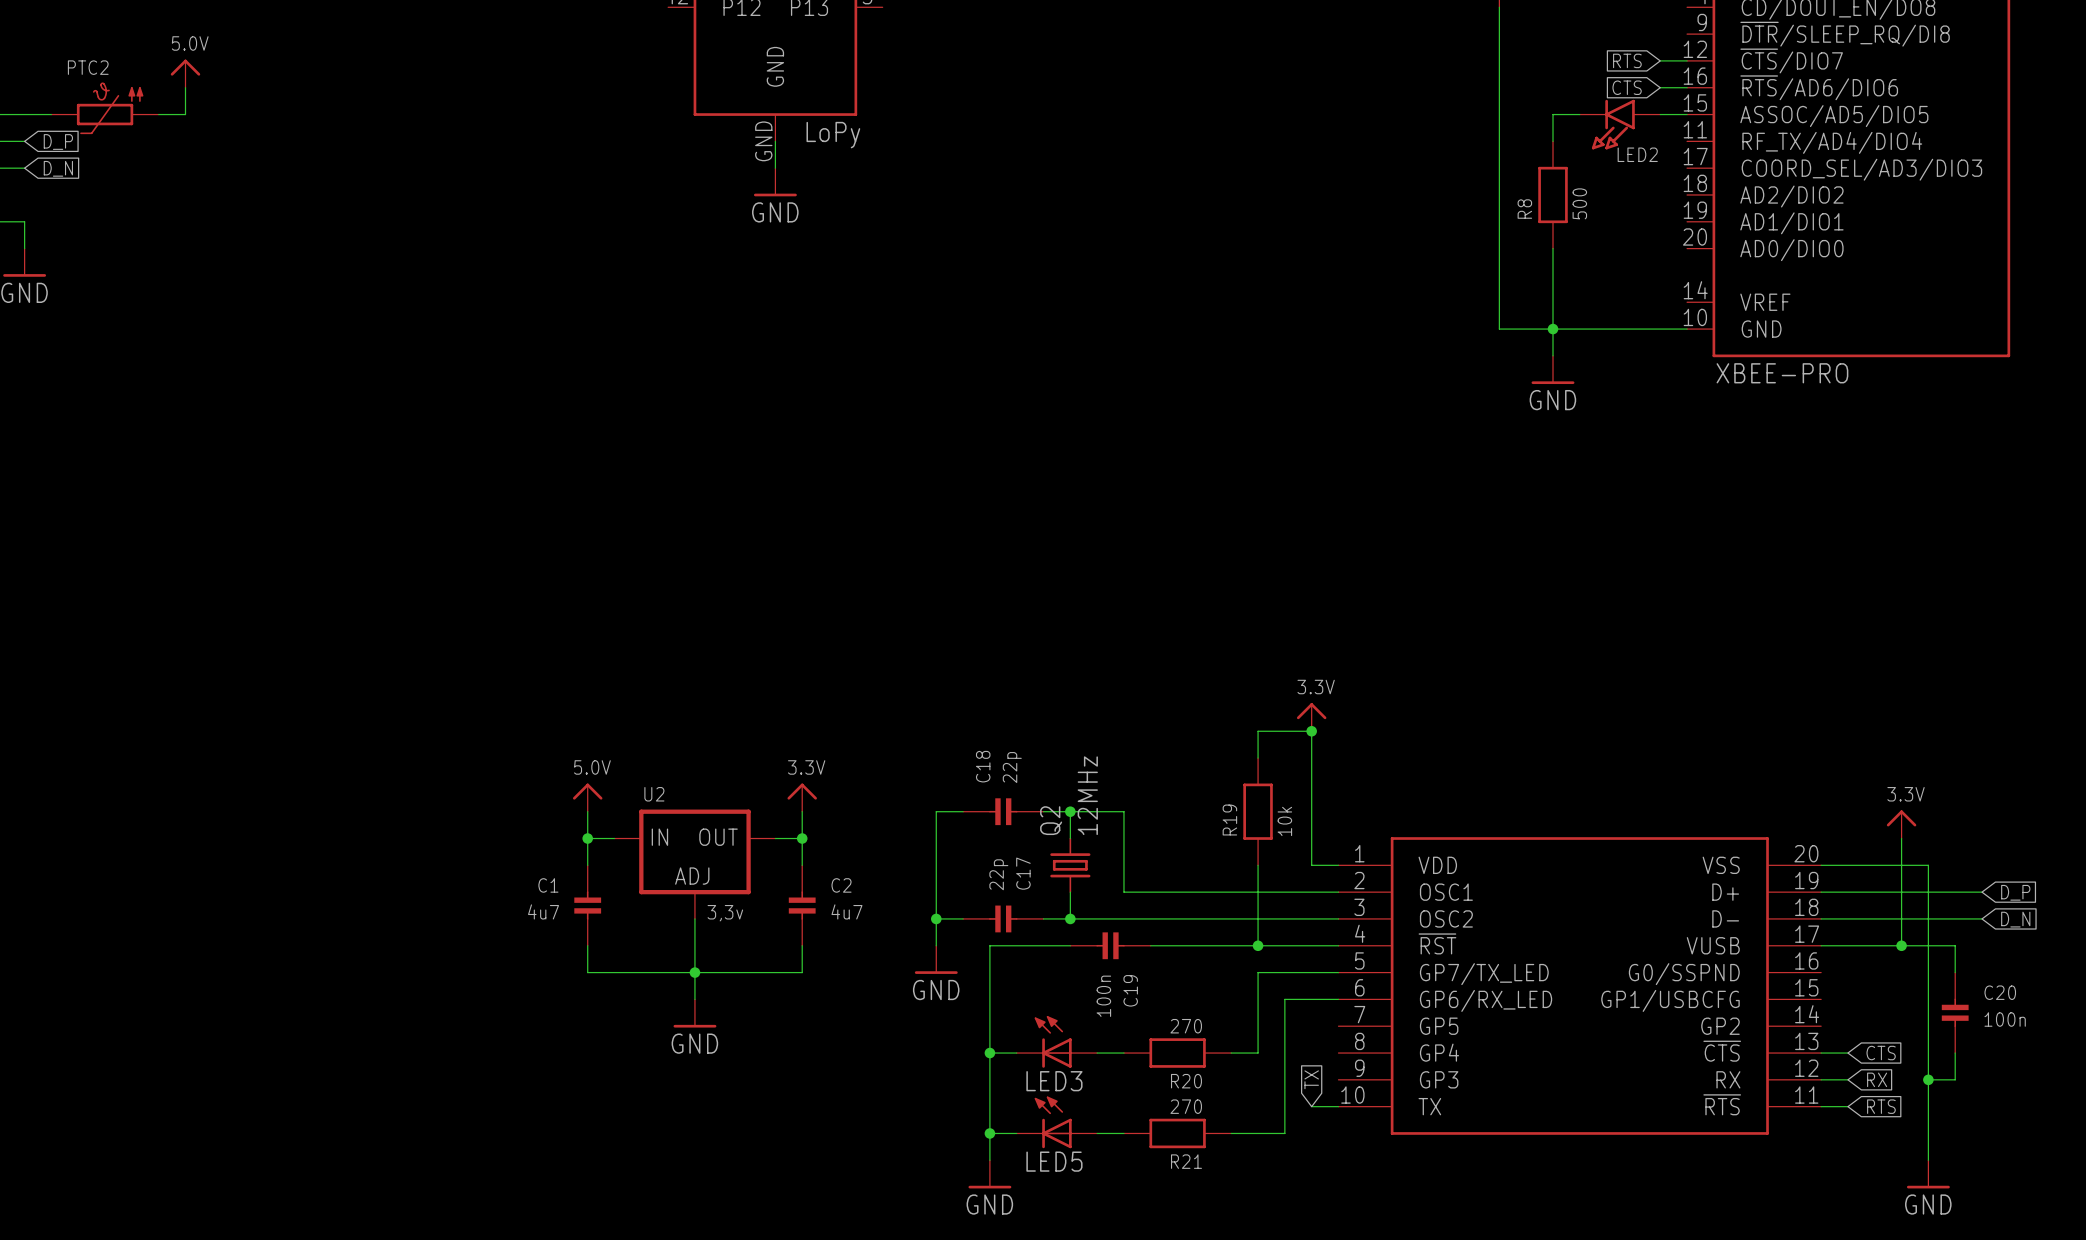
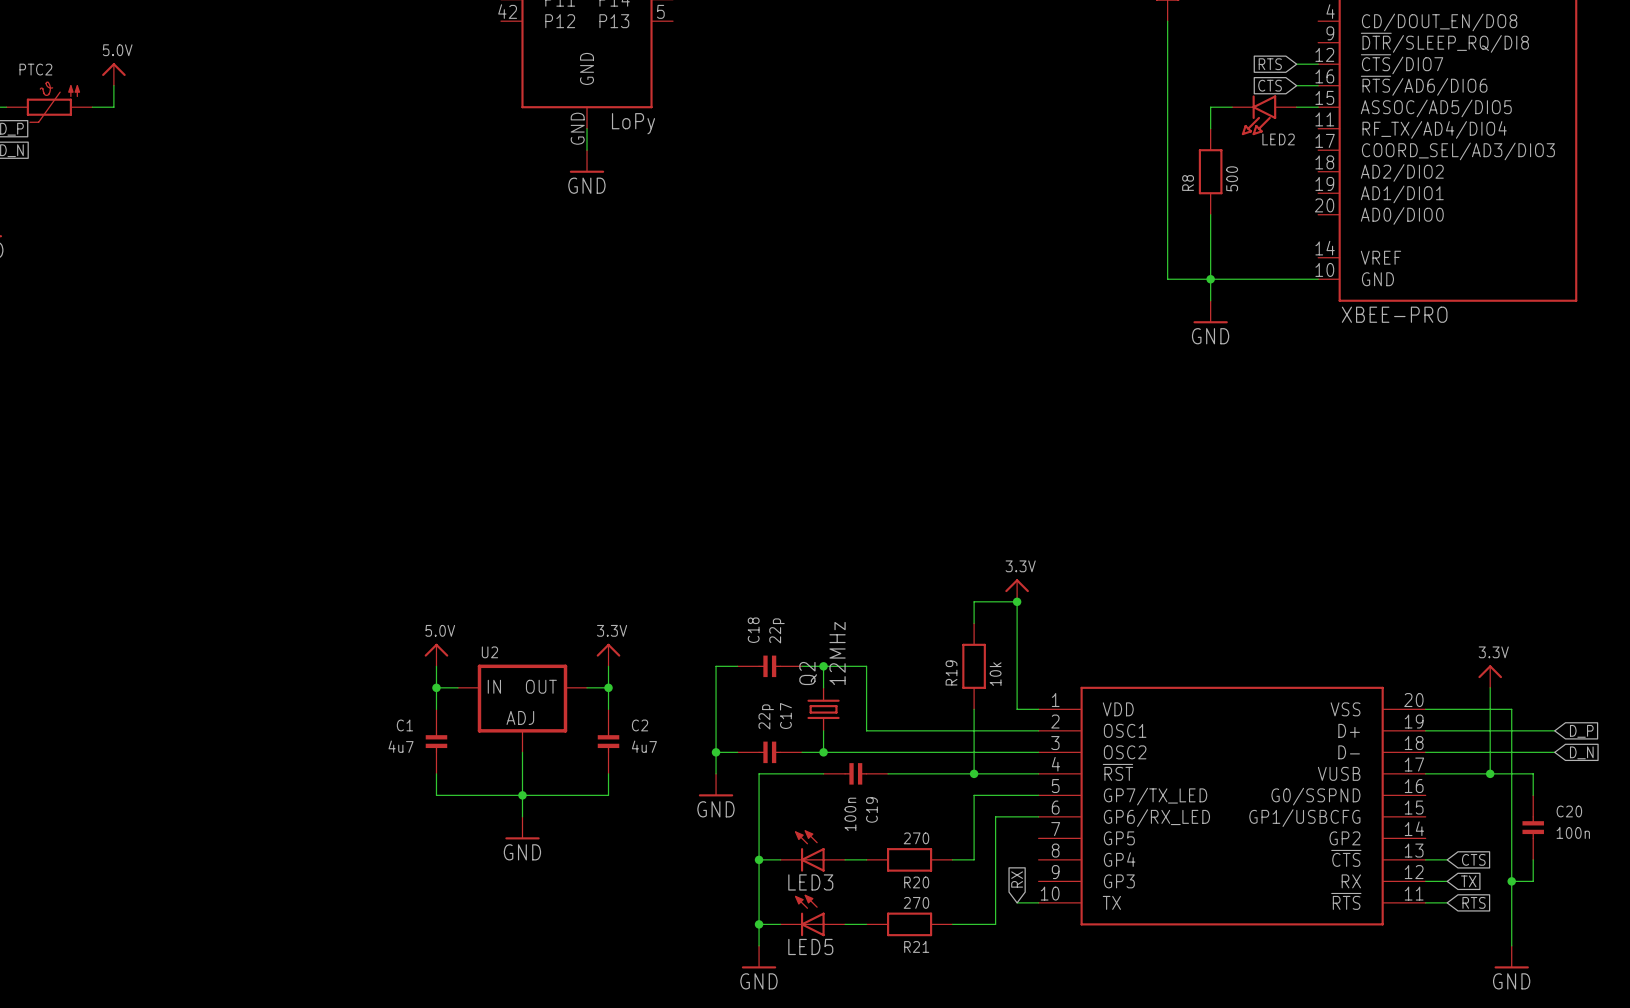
U2 value: 3,3v (725, 913) -> none
global label: TX (1311, 1079) -> RX (1017, 879)
global label: RX (1877, 1079) -> TX (1468, 881)

